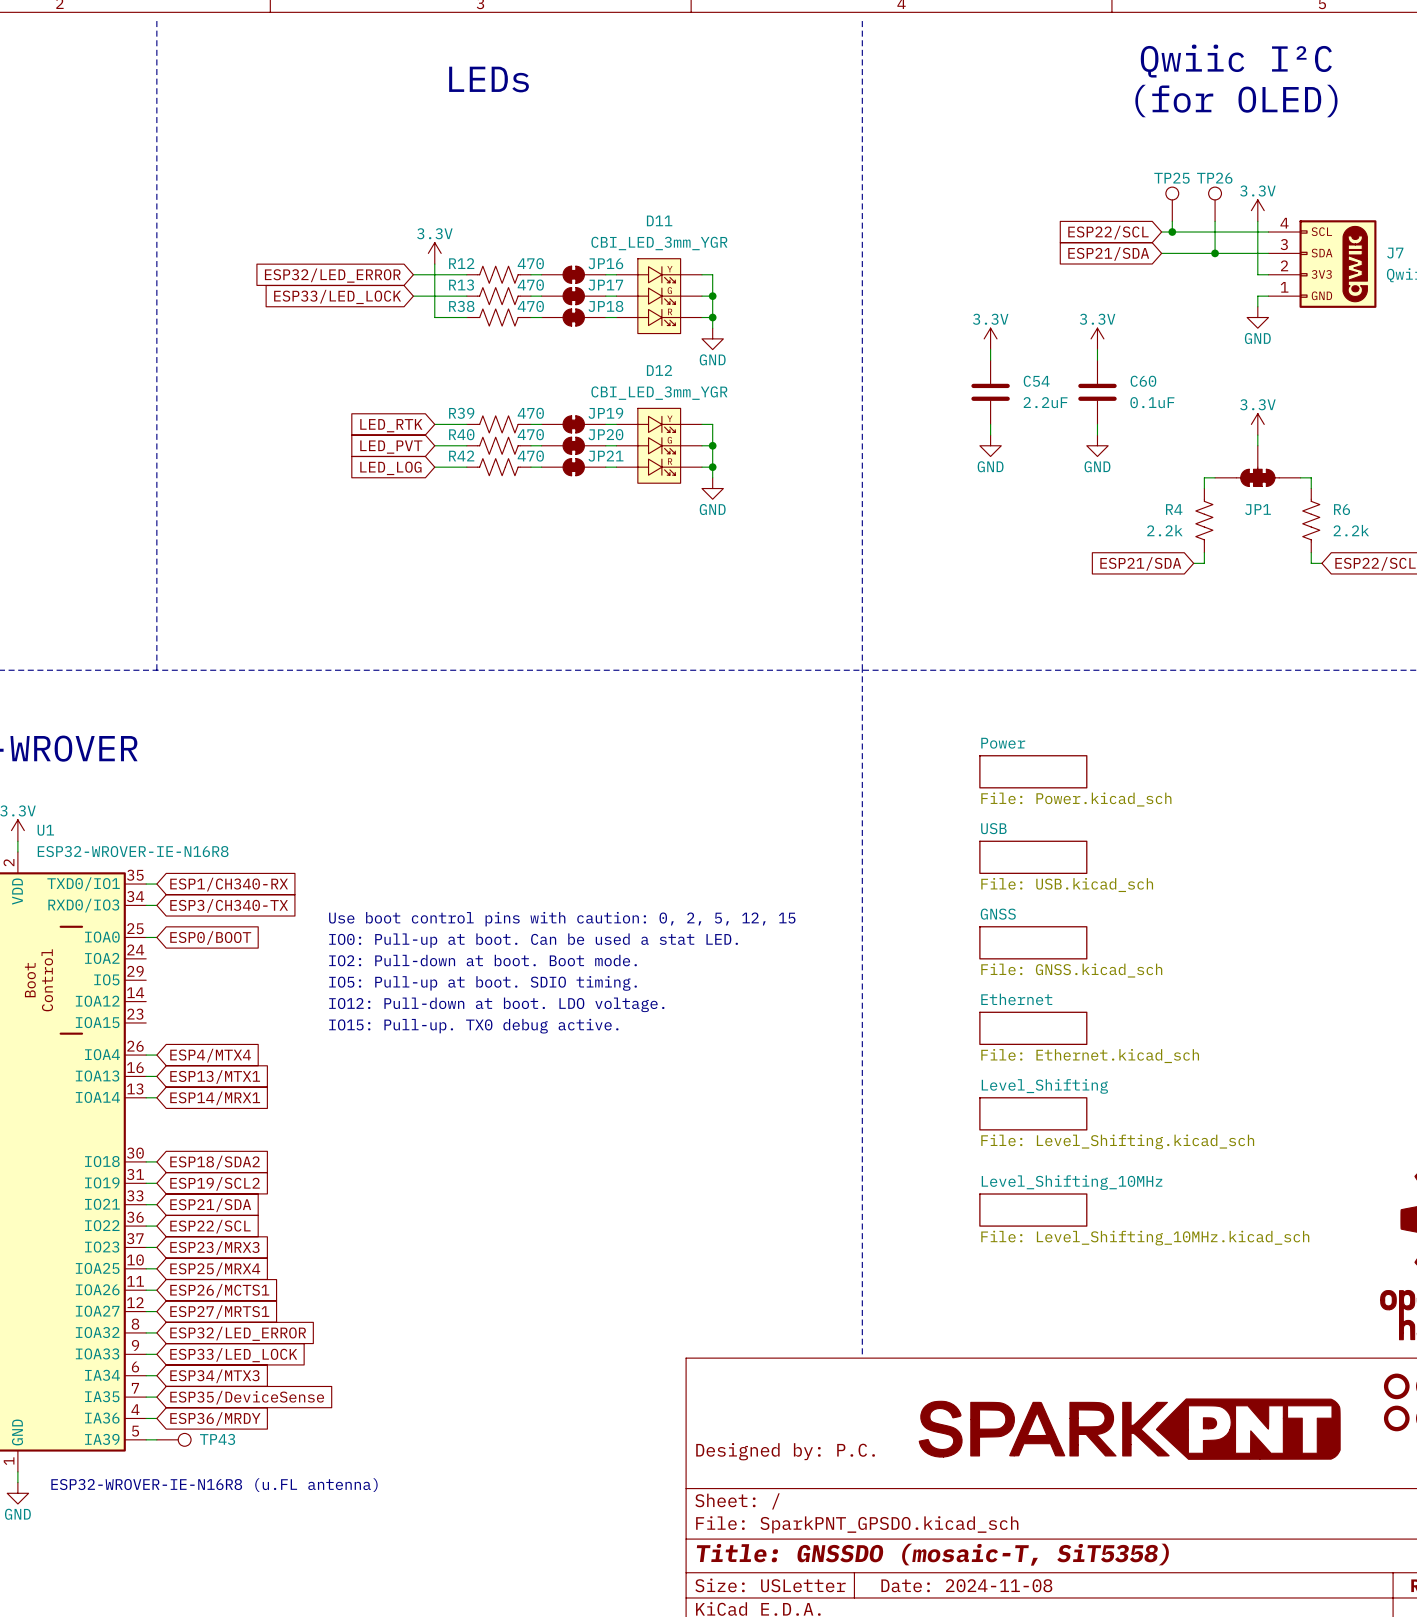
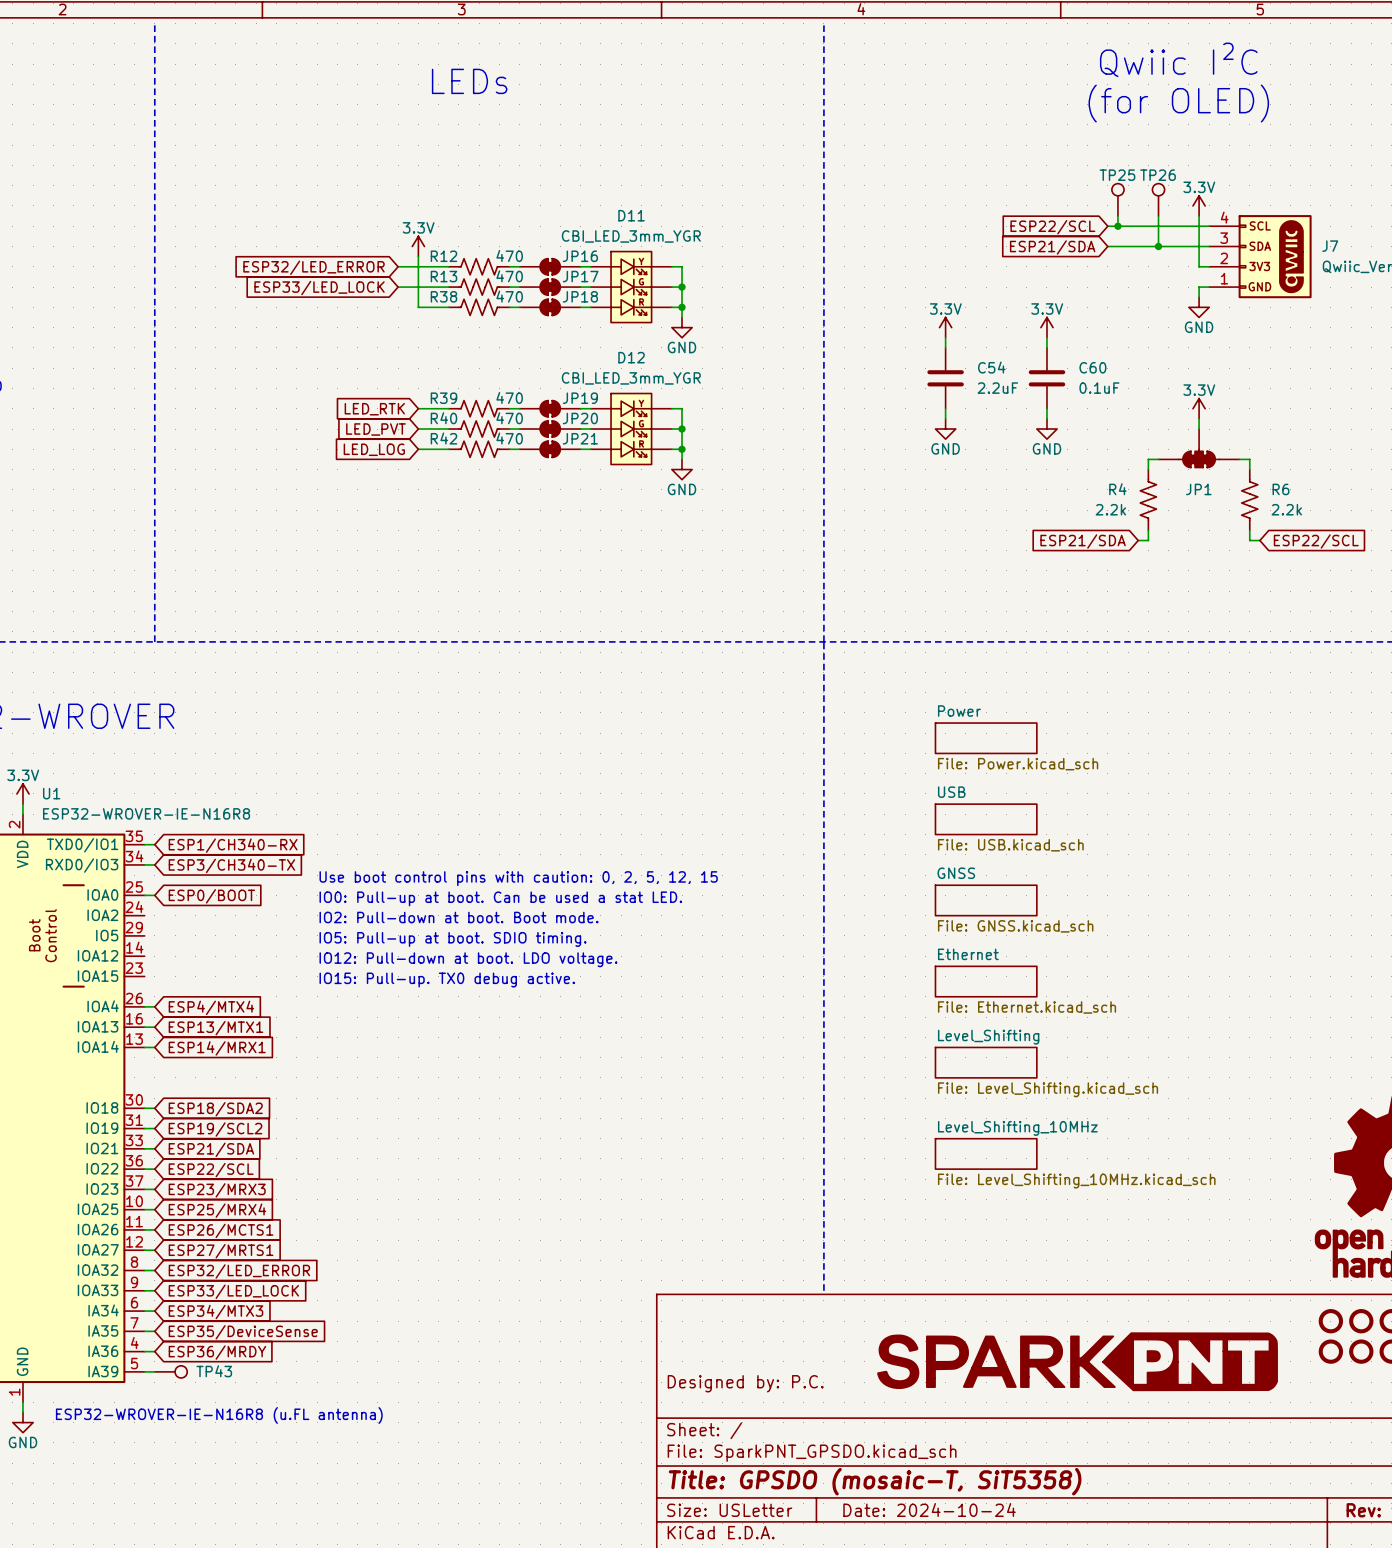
title block: Title: GNSSDO (mosaic-T, SiT5358) (932, 1554) -> Title: GPSDO (mosaic-T, SiT5358) (875, 1481)
title block: Date: 2024-11-08 (966, 1585) -> Date: 2024-10-24 (929, 1509)

